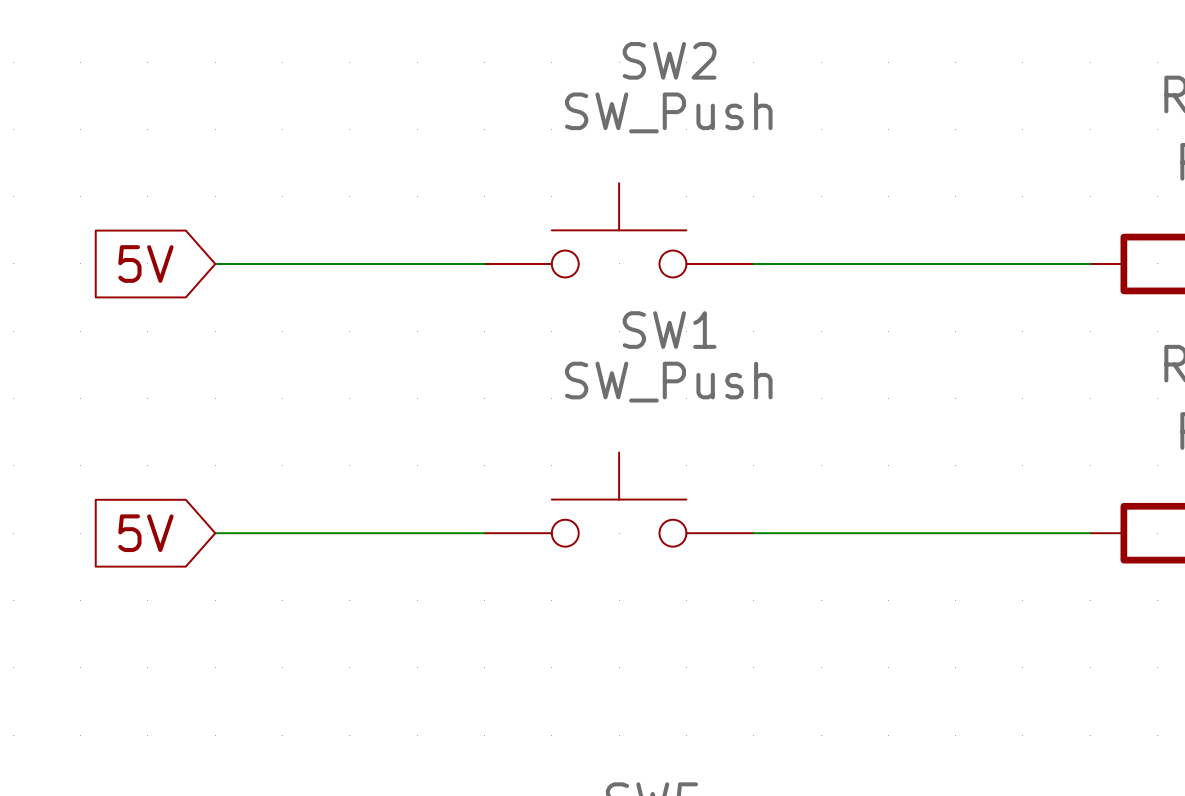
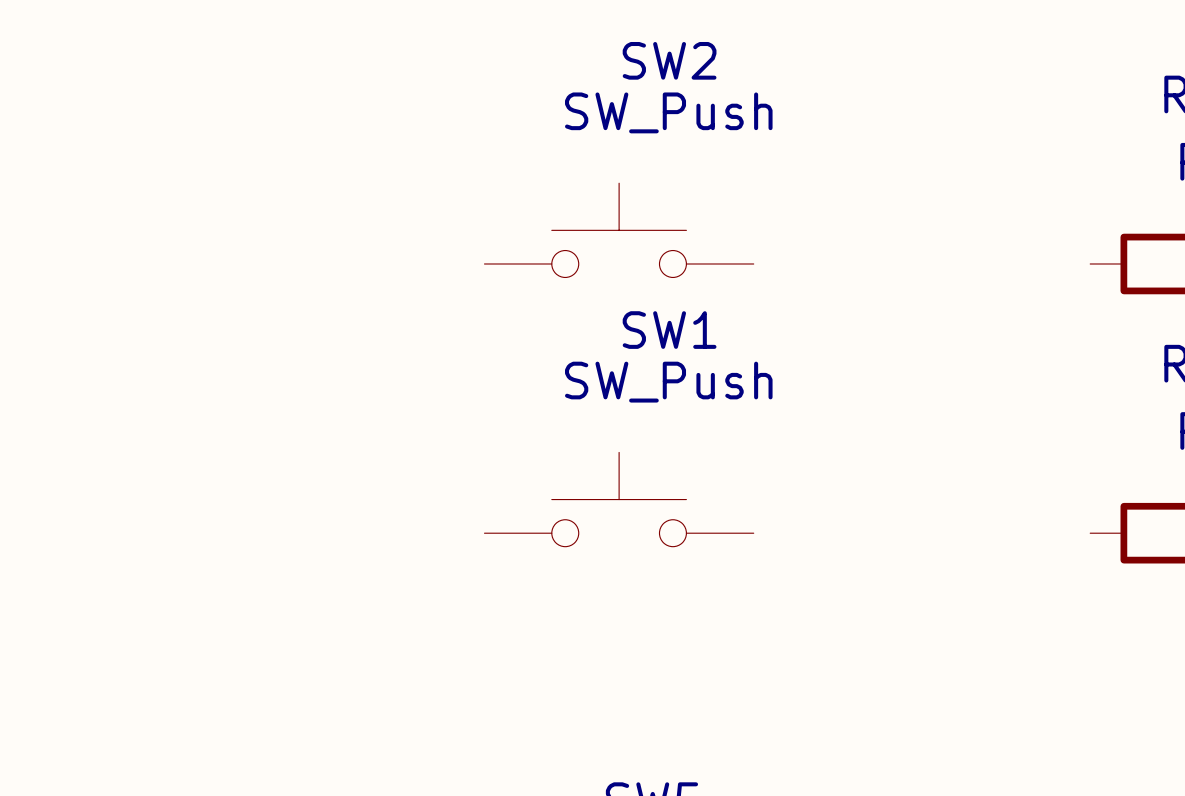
global label: 5V (145, 263) -> none
wire: (215, 263) (484, 263) -> none
wire: (753, 263) (1090, 263) -> none
global label: 5V (145, 533) -> none
wire: (215, 533) (484, 533) -> none
wire: (753, 533) (1090, 533) -> none

